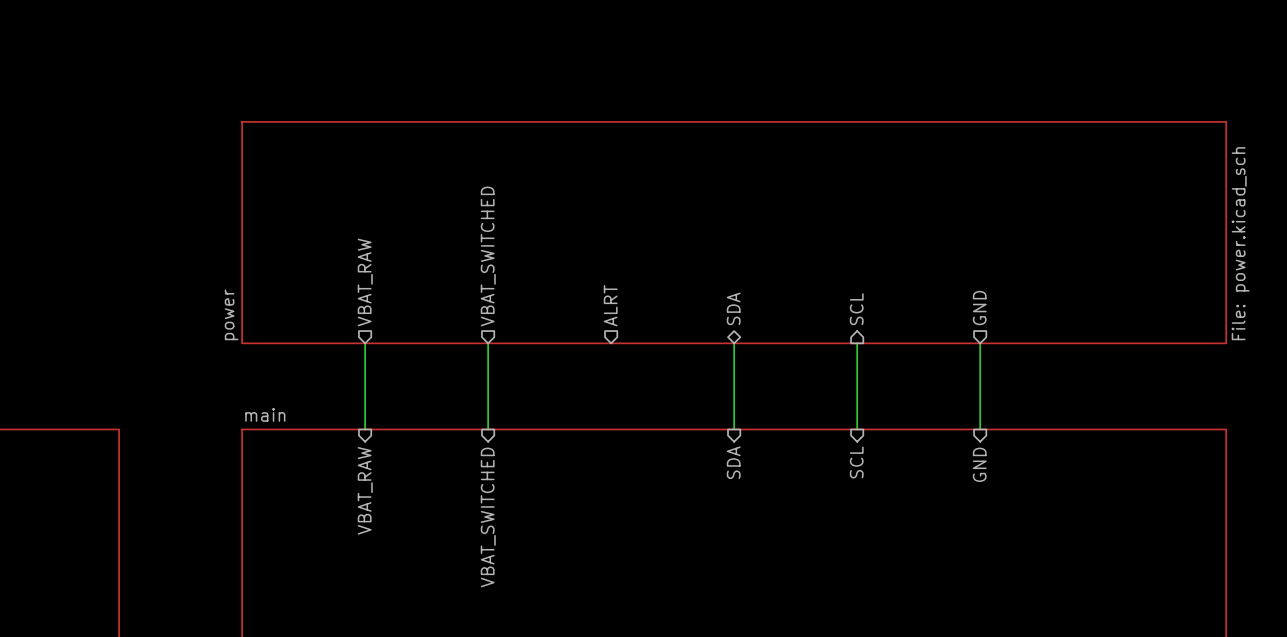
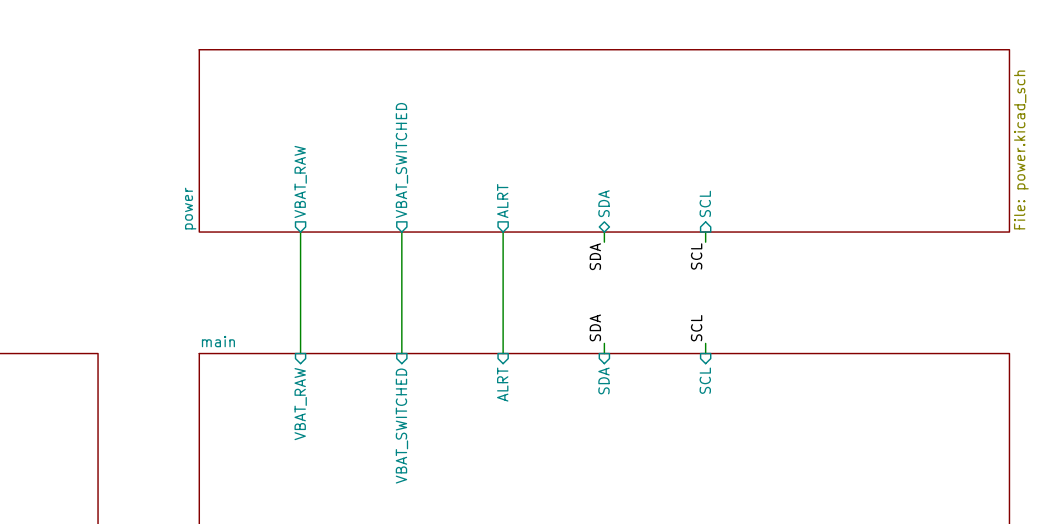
sheet power position: (734, 232) -> (604, 140)
sheet pin: none -> ALRT (502, 201)
sheet pin position: VBAT_SWITCHED (488, 256) -> VBAT_SWITCHED (401, 160)
wire: none -> (300, 232) (300, 282)
wire: none -> (401, 232) (401, 282)
wire: none -> (503, 232) (503, 353)
wire: none -> (604, 232) (604, 242)
wire: none -> (705, 232) (705, 242)
sheet pin position: VBAT_RAW (365, 282) -> VBAT_RAW (300, 181)
sheet pin: ALRT (610, 305) -> none
sheet pin position: SDA (733, 308) -> SDA (604, 203)
sheet pin: GND (979, 308) -> none
sheet pin position: SCL (856, 309) -> SCL (705, 203)
label: none -> SDA (595, 256)
label: none -> SCL (696, 256)
wire: (734, 343) (734, 417) -> none
wire: (857, 343) (857, 417) -> none
wire: (980, 343) (980, 429) -> none
label: none -> SDA (595, 327)
label: none -> SCL (696, 328)
sheet pin: GND (979, 464) -> none
sheet pin: none -> ALRT (502, 384)

